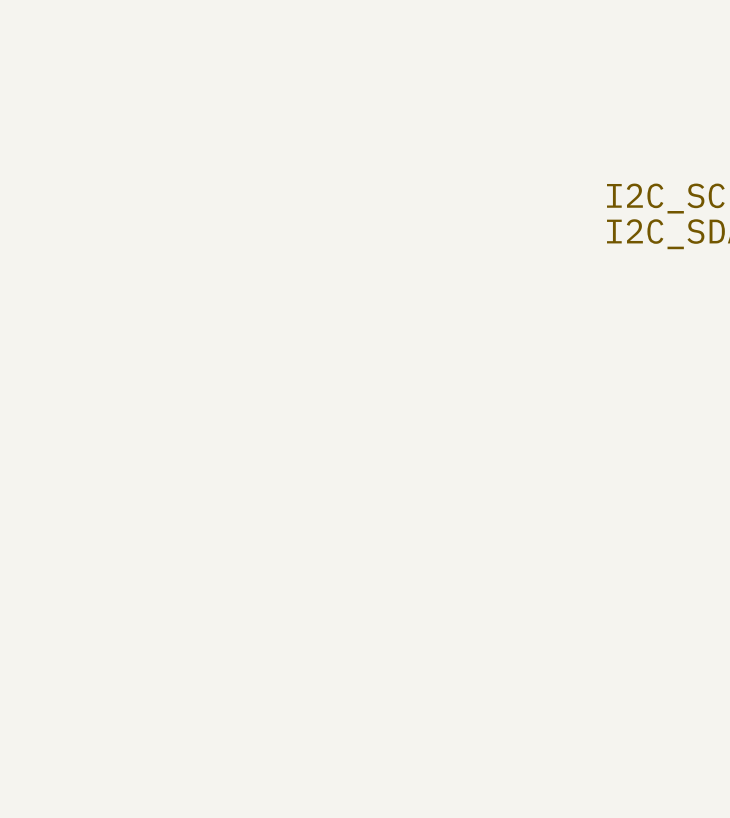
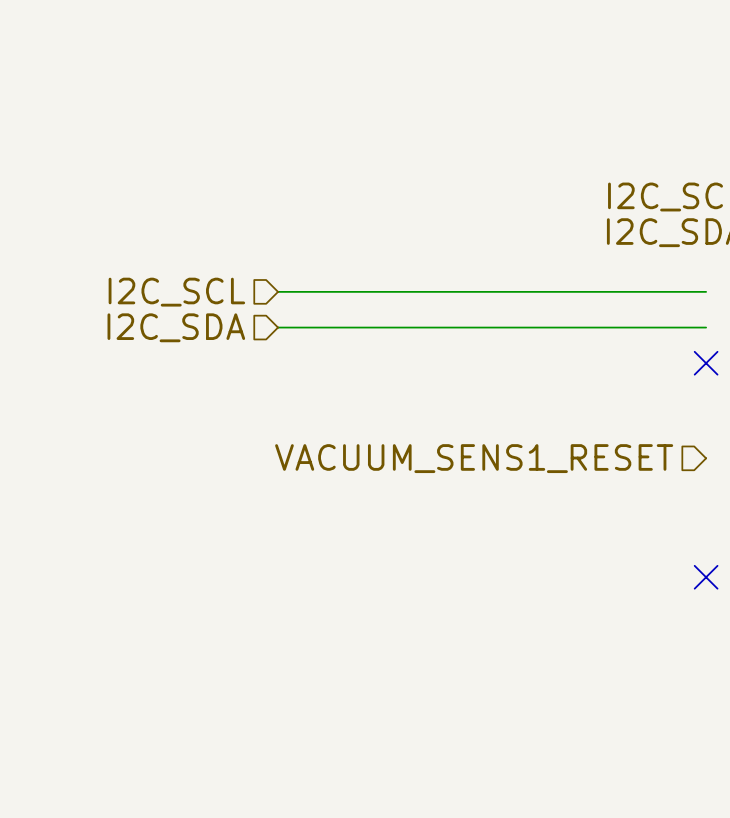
wire: none -> (278, 291) (706, 291)
hierarchical label: none -> I2C_SCL (176, 292)
wire: none -> (278, 327) (706, 327)
hierarchical label: none -> I2C_SDA (176, 327)
no-connect mark: none -> (706, 363)
hierarchical label: none -> VACUUM_SENS1_RESET (474, 458)
no-connect mark: none -> (706, 577)

